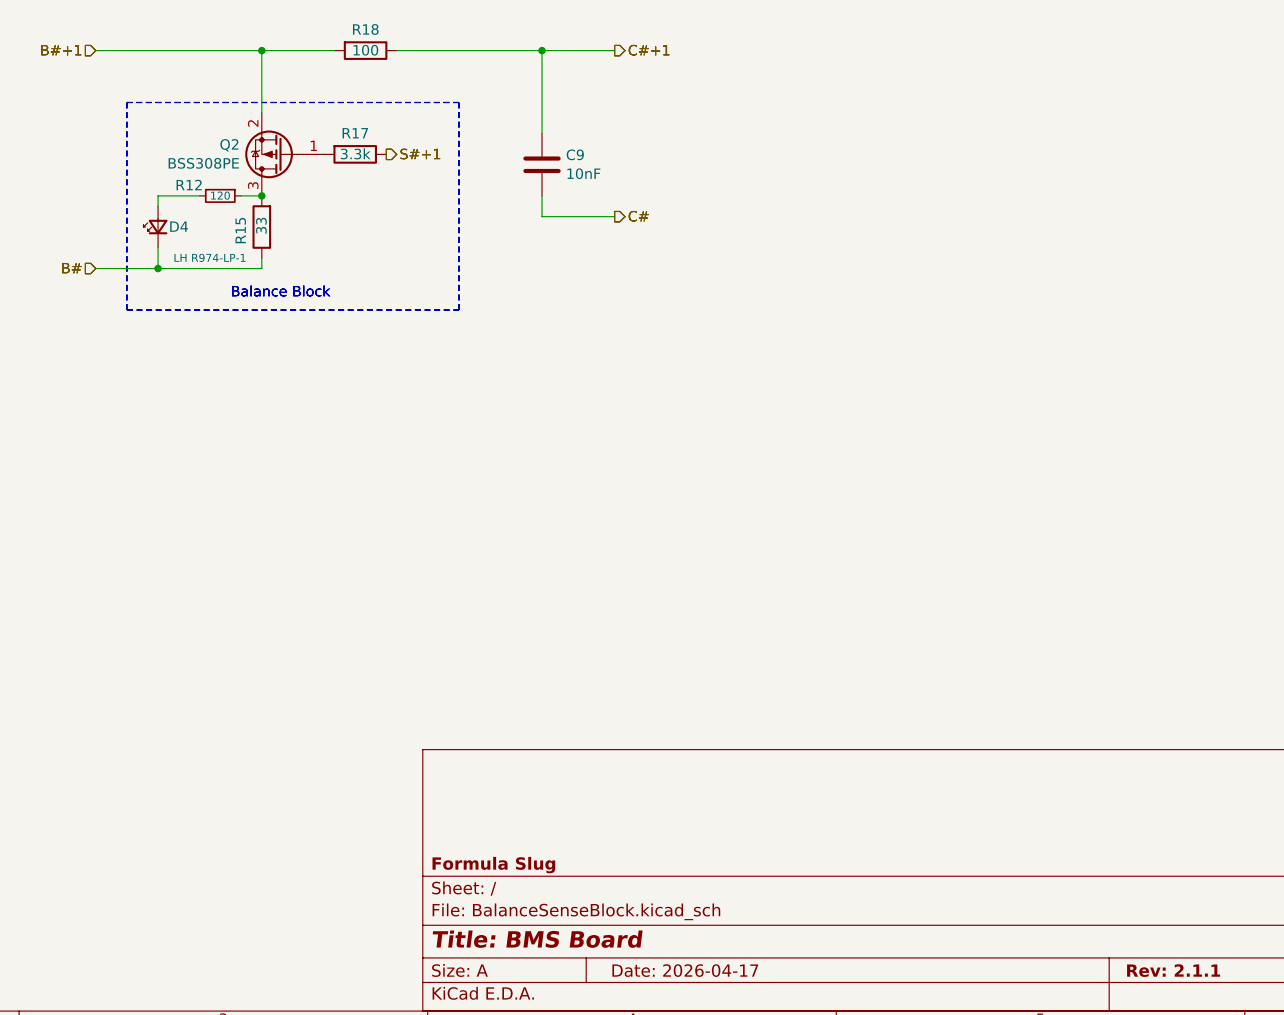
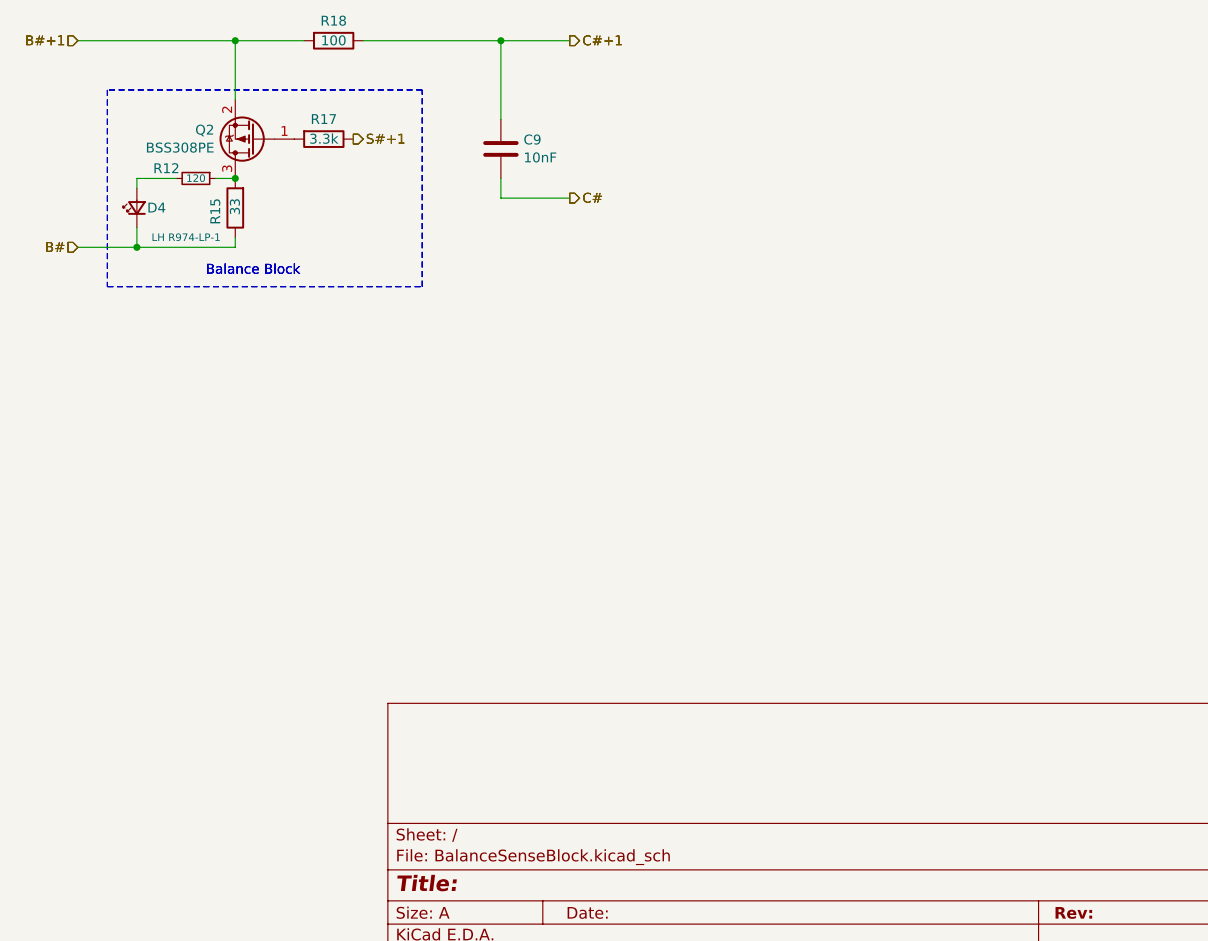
title block: Formula Slug (493, 865) -> none
title block: Title: BMS Board (537, 939) -> Title: (427, 883)
title block: Date: 2026-04-17 (685, 970) -> Date: (587, 912)
title block: Rev: 2.1.1 (1173, 970) -> Rev: (1073, 912)

